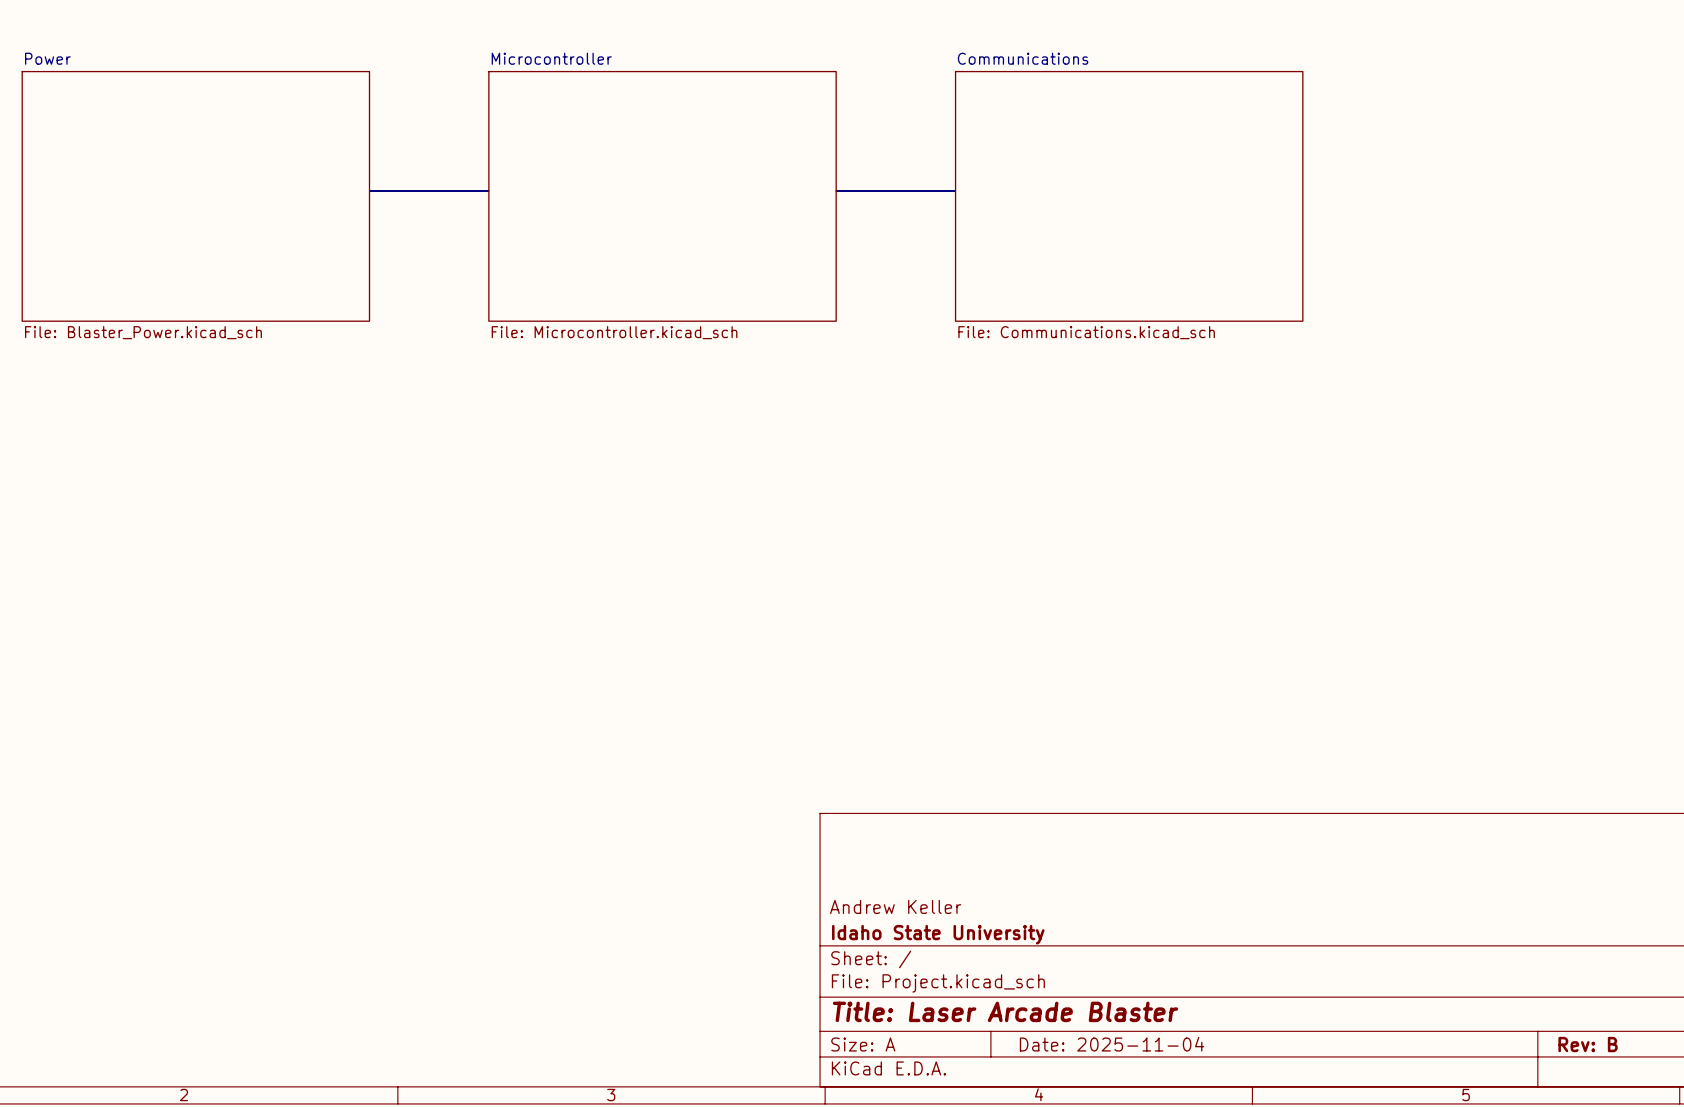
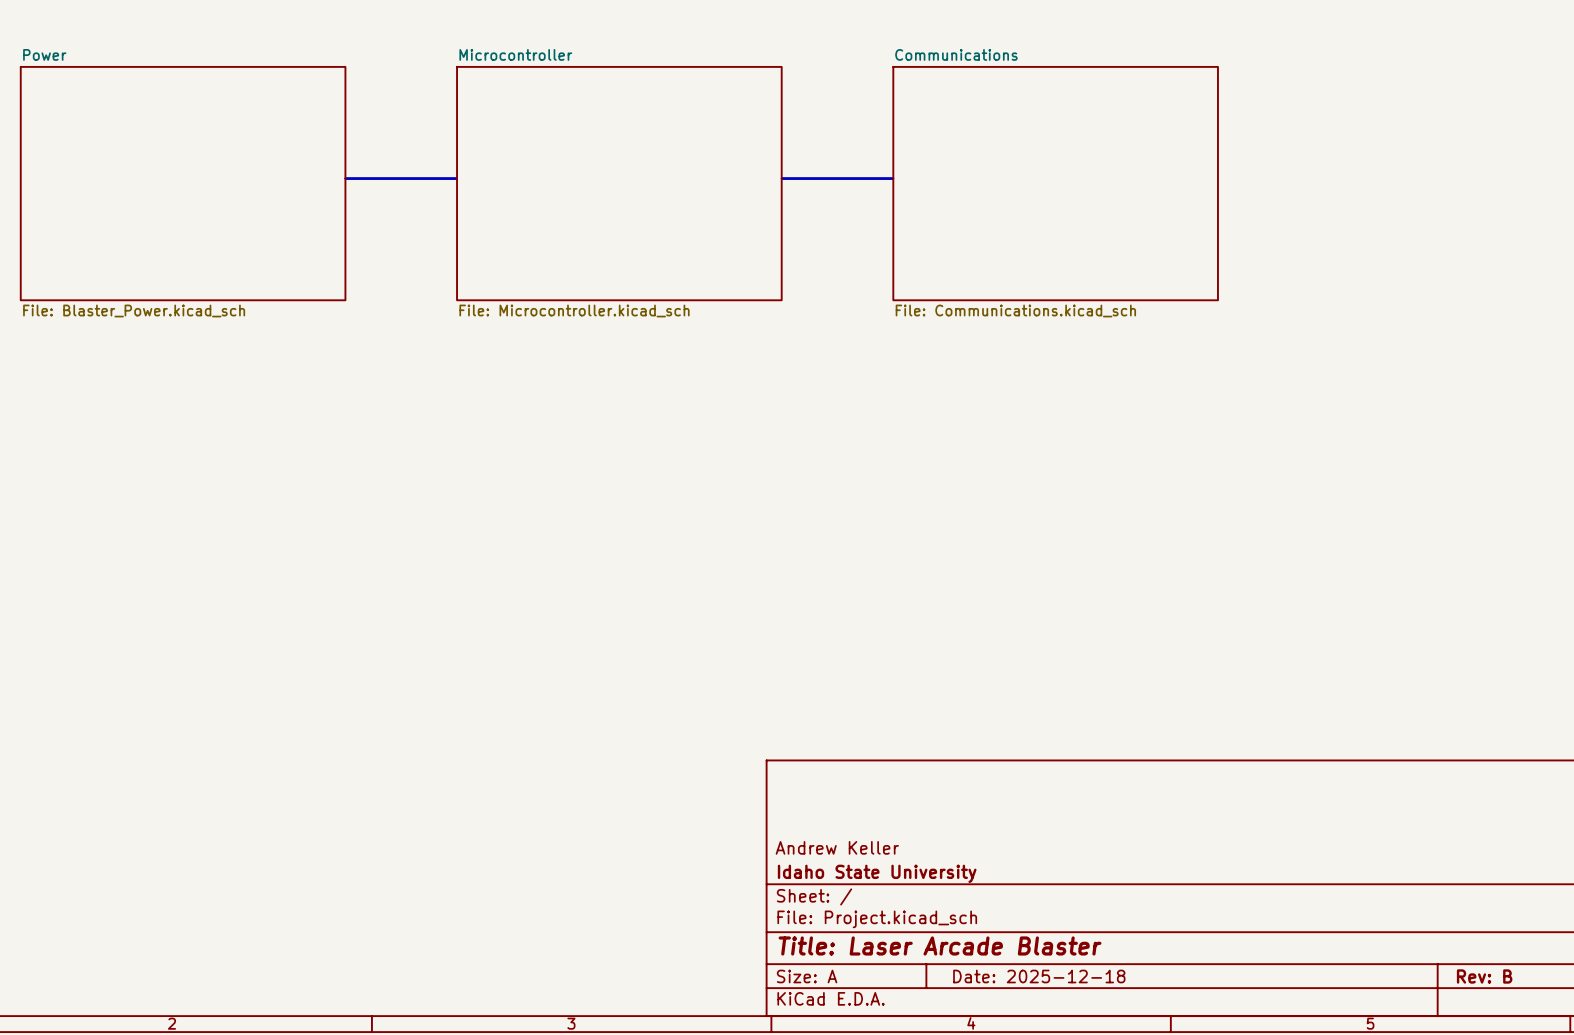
title block: Date: 2025-11-04 (1112, 1044) -> Date: 2025-12-18 (1039, 976)

